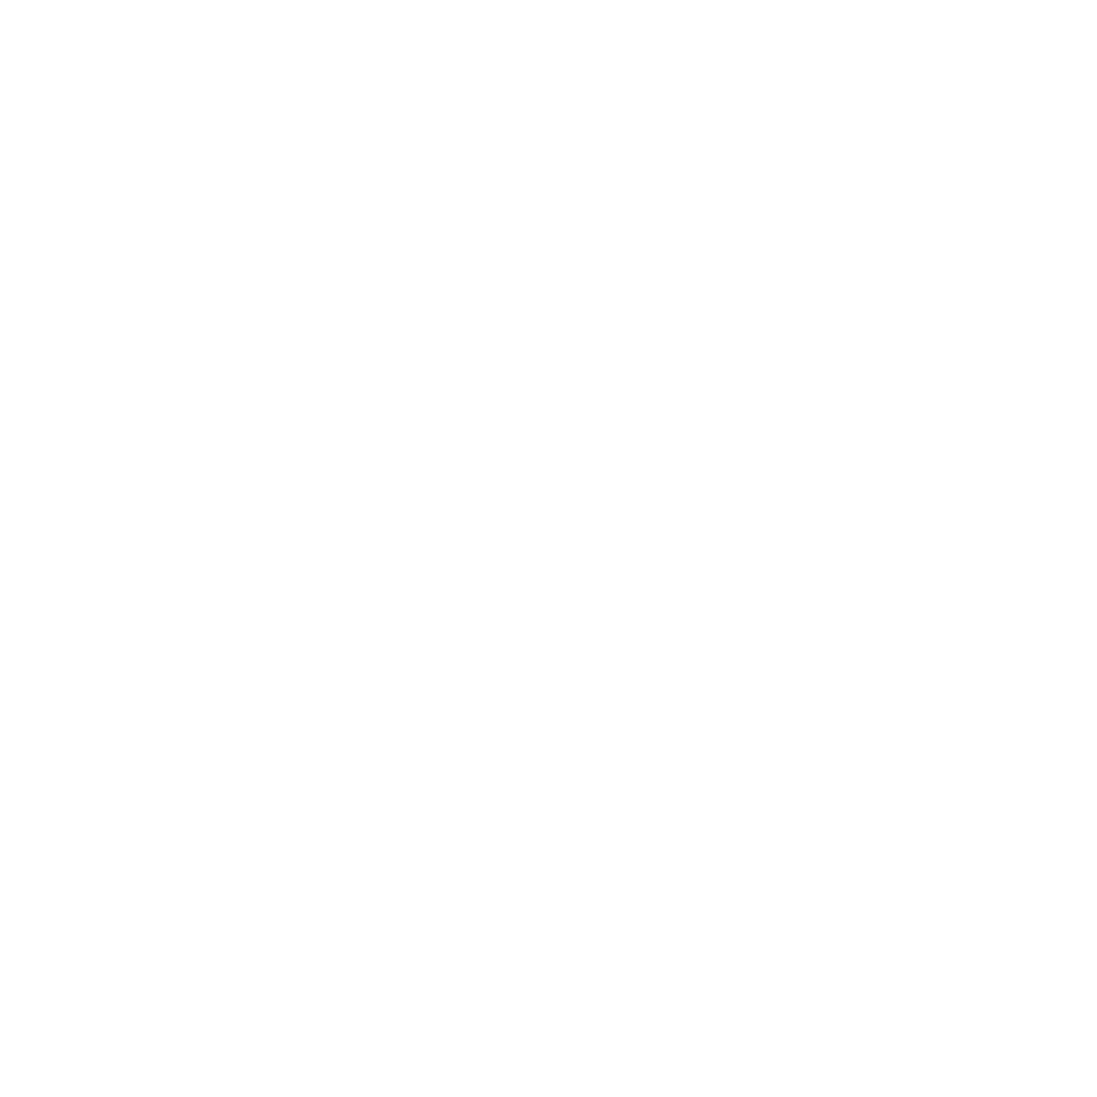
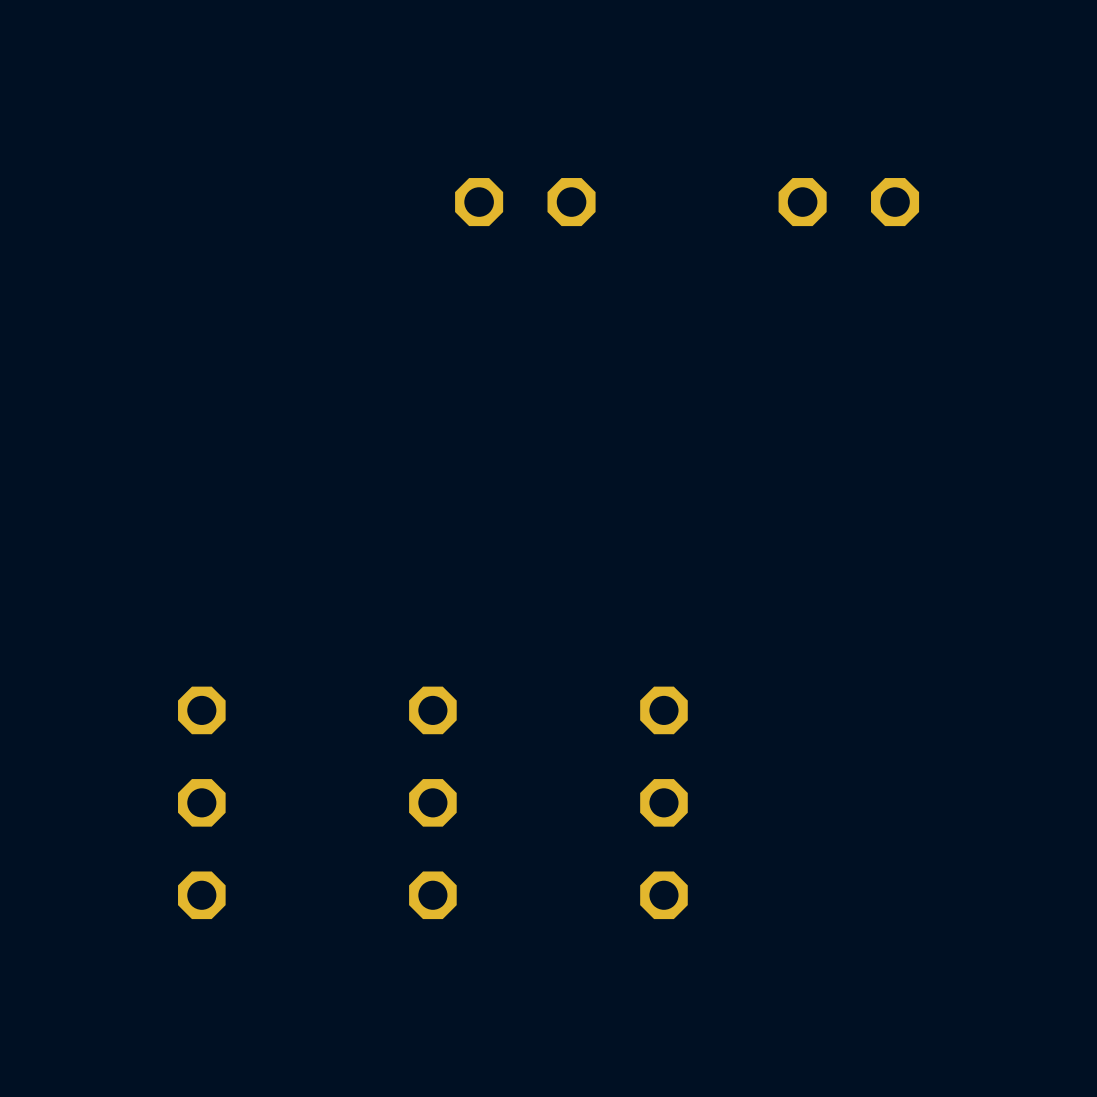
part: none -> (525, 202)
part: none -> (848, 202)
part: none -> (201, 802)
part: none -> (432, 802)
part: none -> (663, 802)

